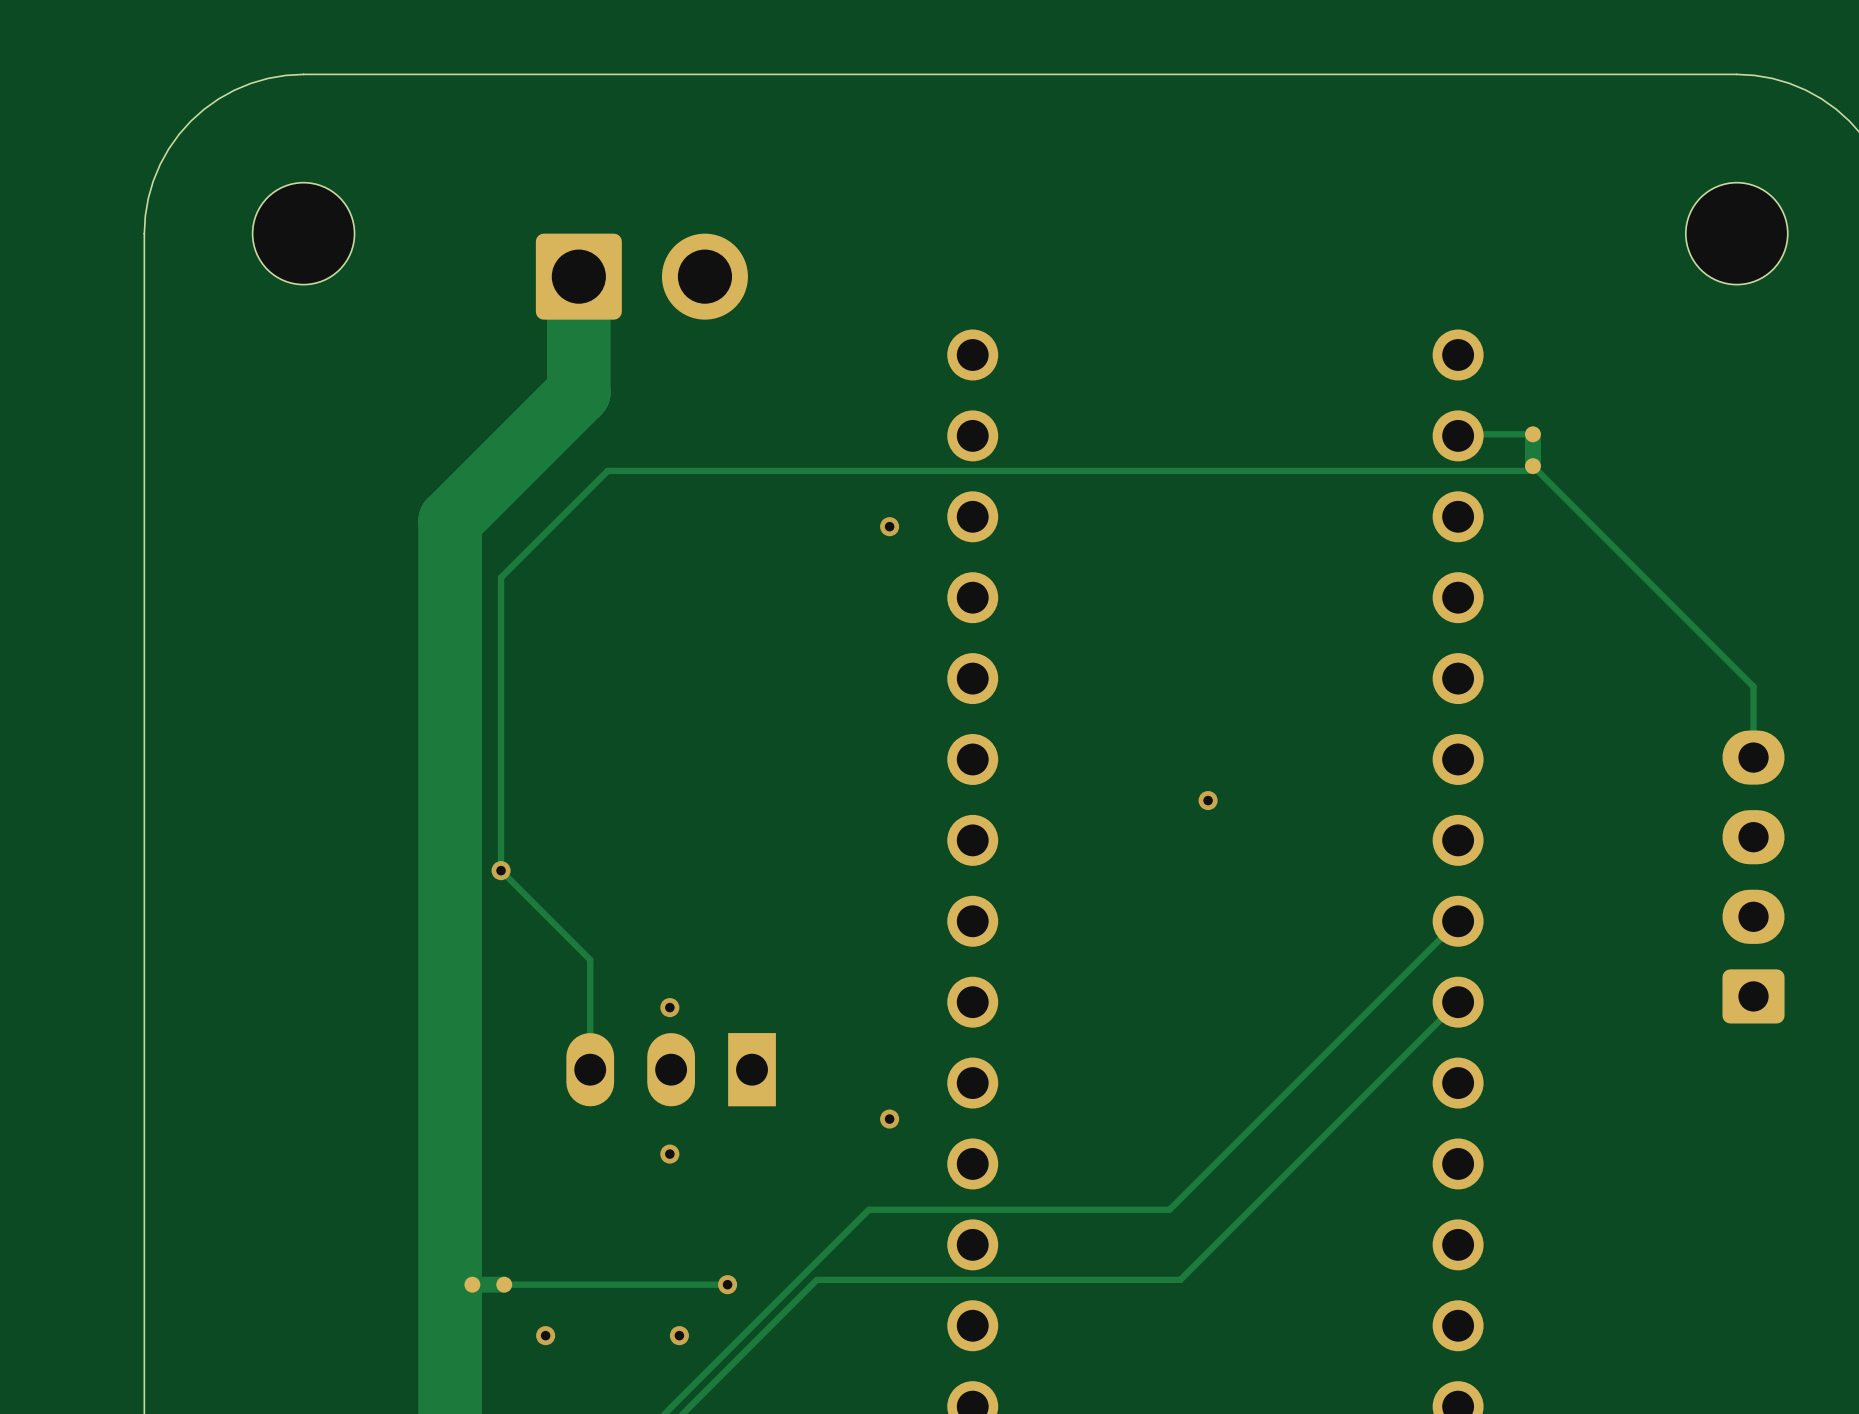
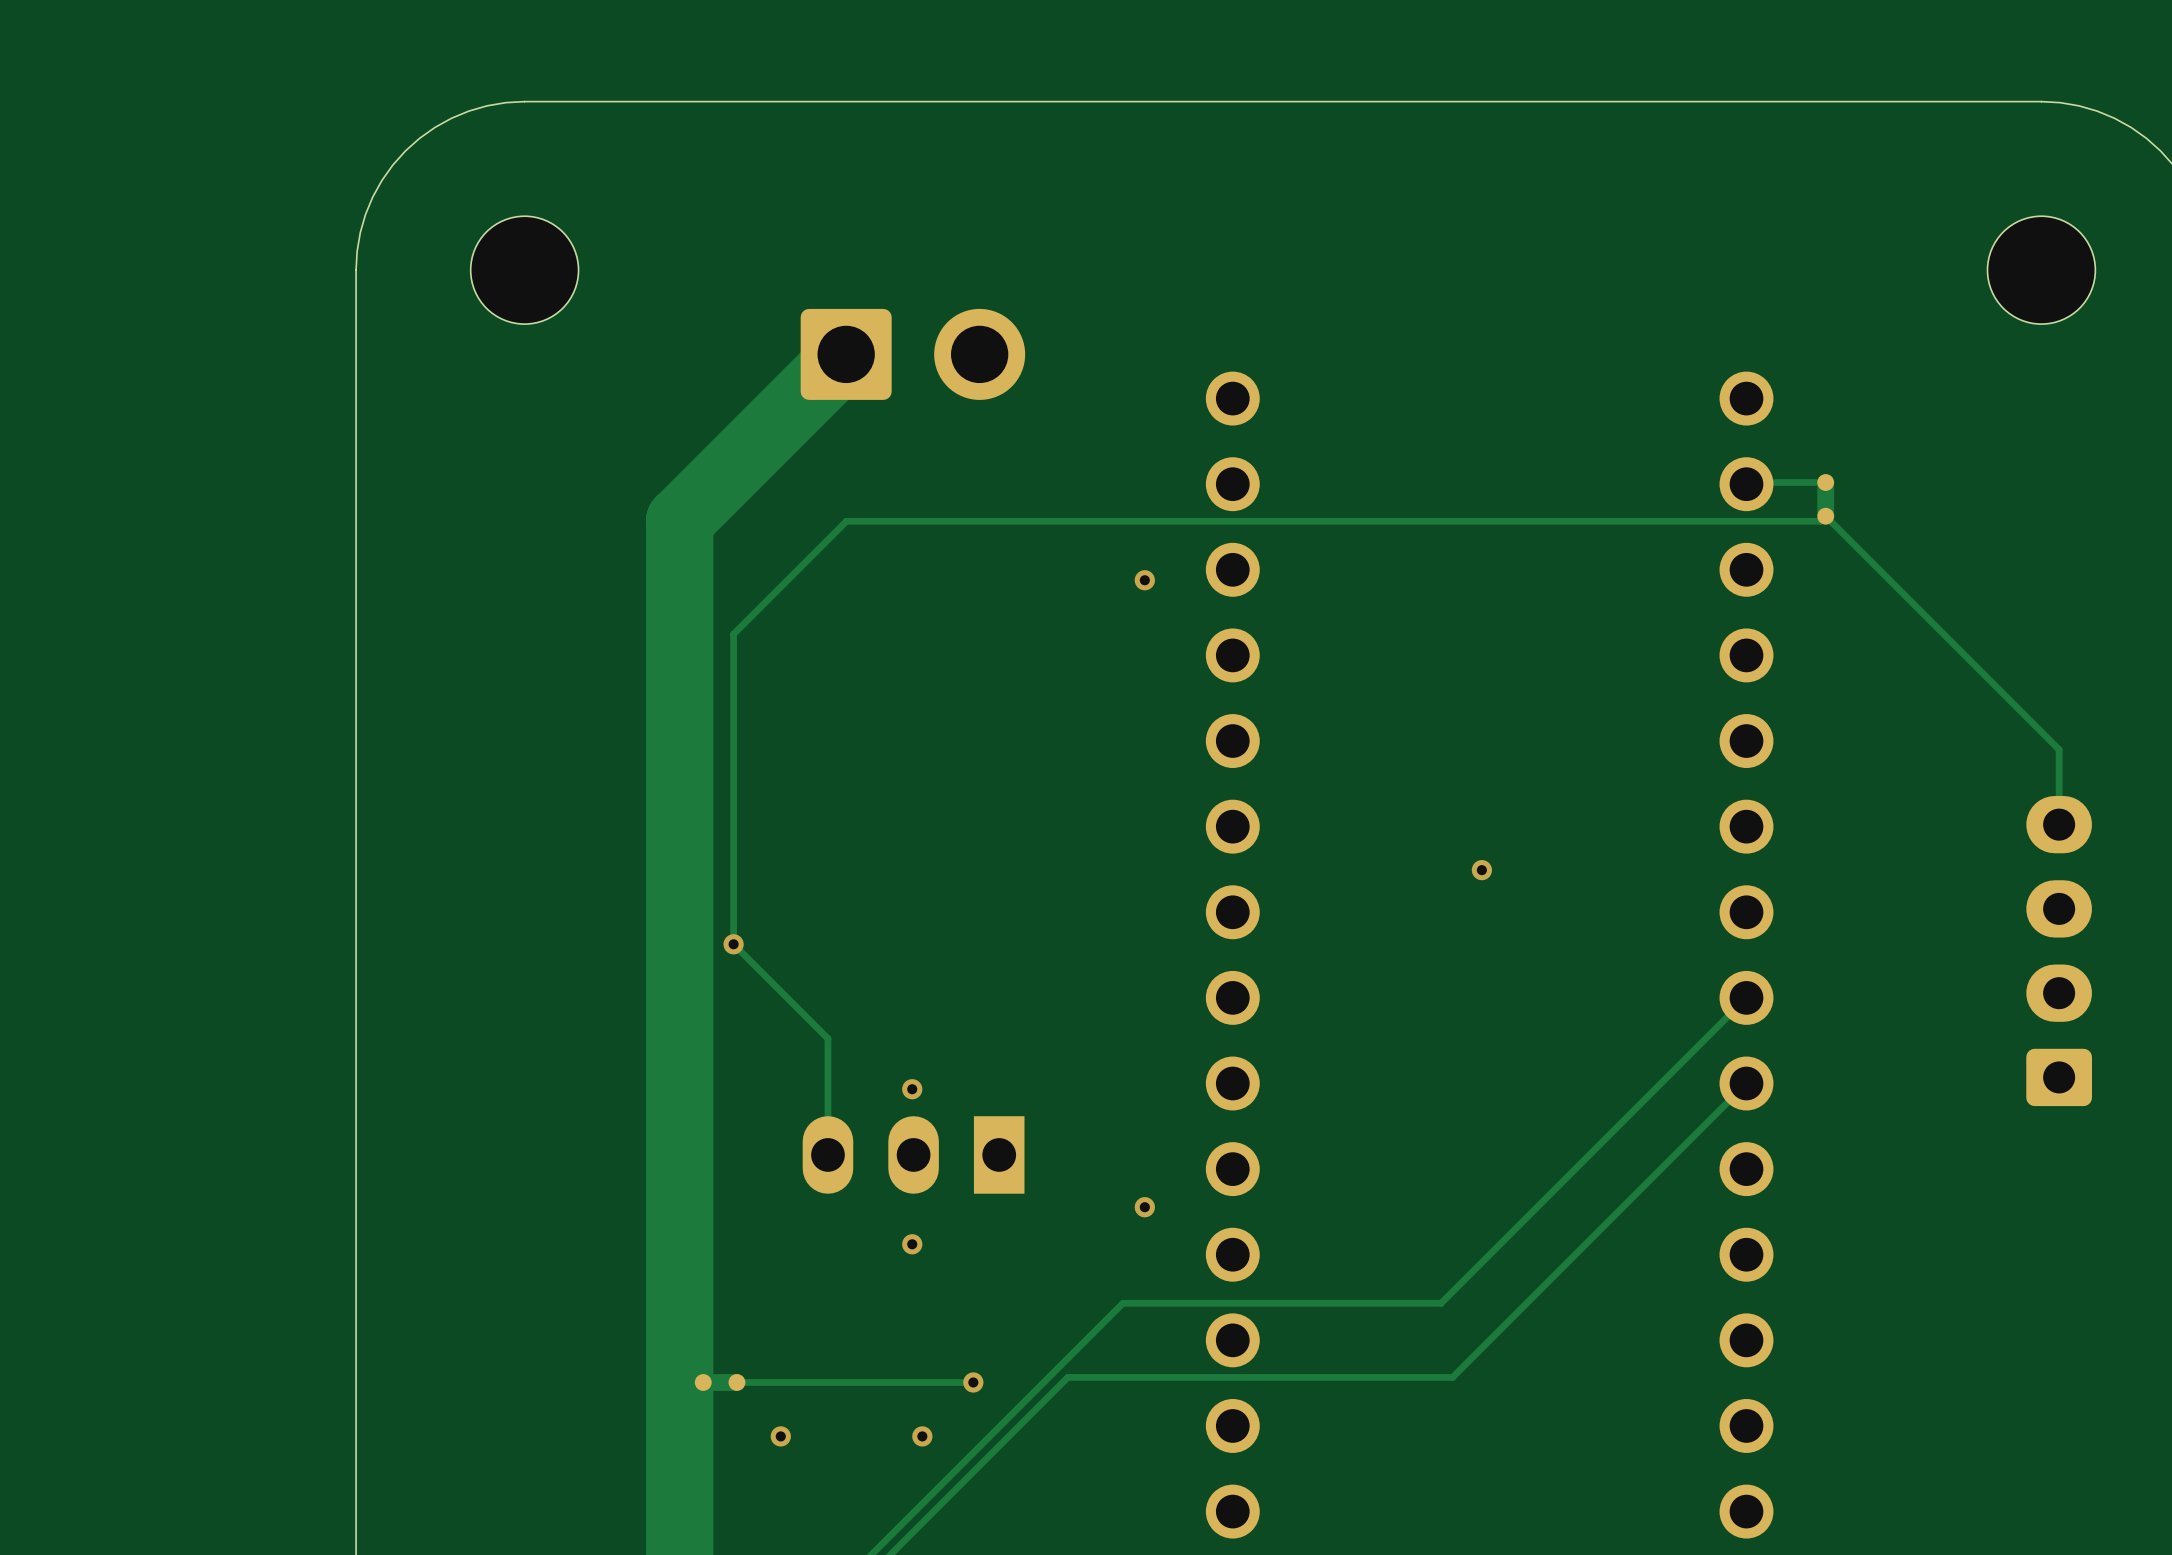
track: (578, 276) (578, 392) (450, 520) -> (846, 354) (679, 520) (679, 574)
part position: (641, 276) -> (912, 354)

